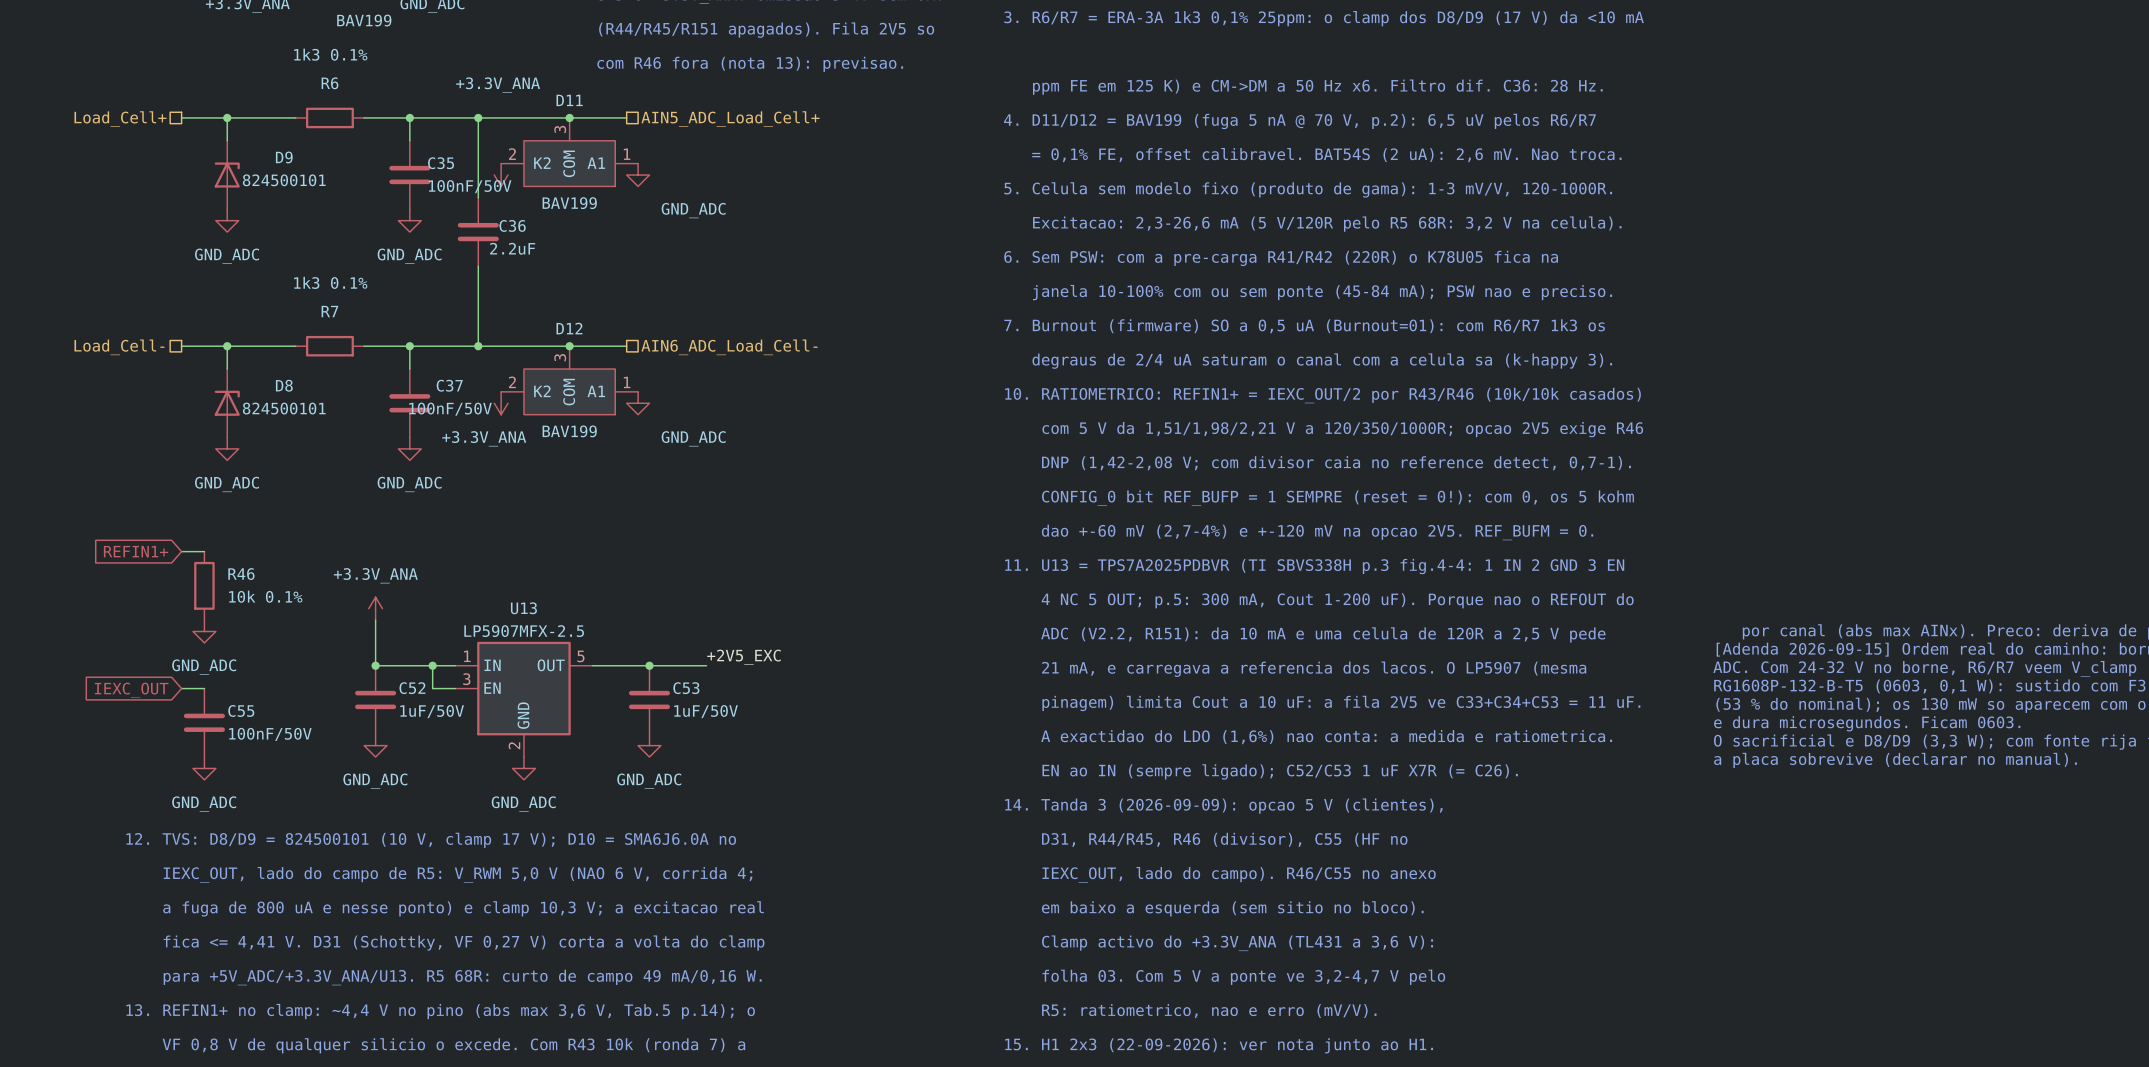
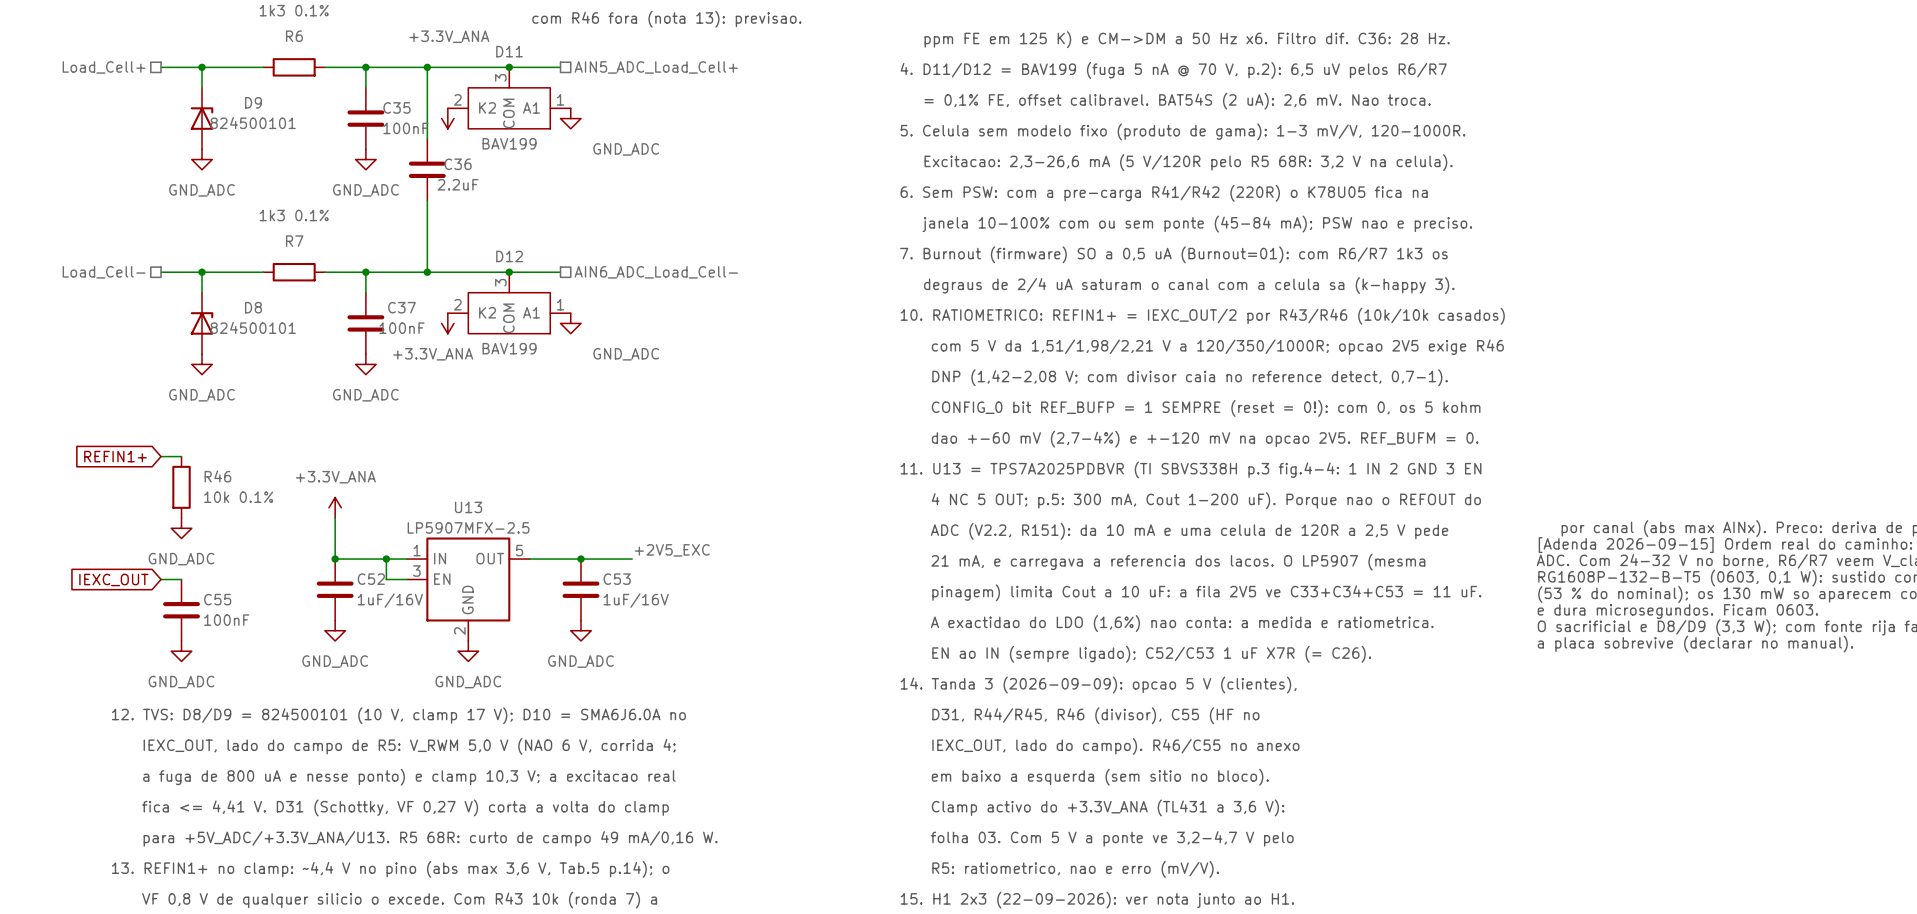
C35 value: 100nF/50V (470, 186) -> 100nF (406, 128)
C37 value: 100nF/50V (450, 409) -> 100nF (401, 328)
C52 value: 1uF/50V (432, 711) -> 1uF/16V (390, 600)
C53 value: 1uF/50V (706, 711) -> 1uF/16V (636, 600)
C55 value: 100nF/50V (270, 734) -> 100nF (226, 620)

